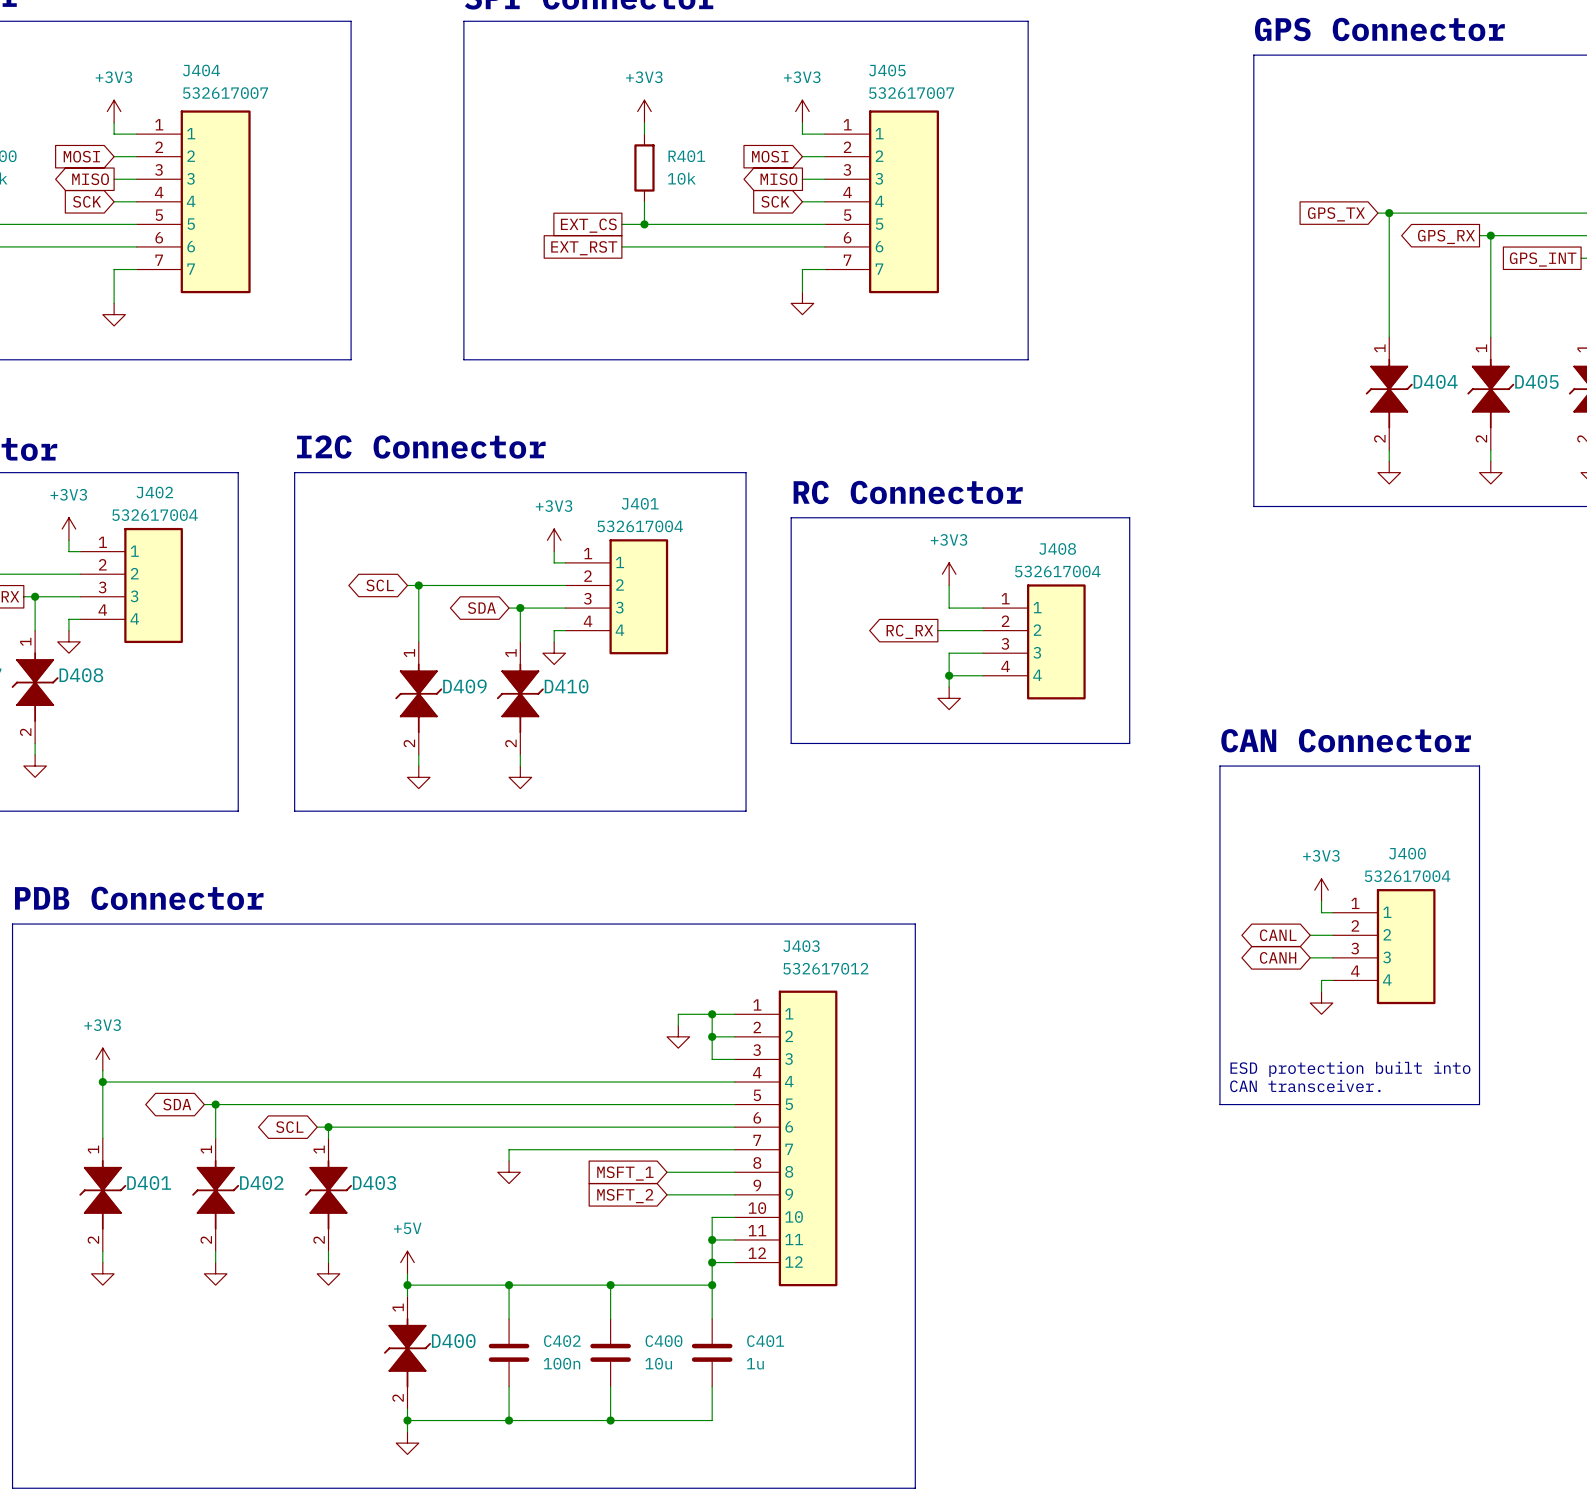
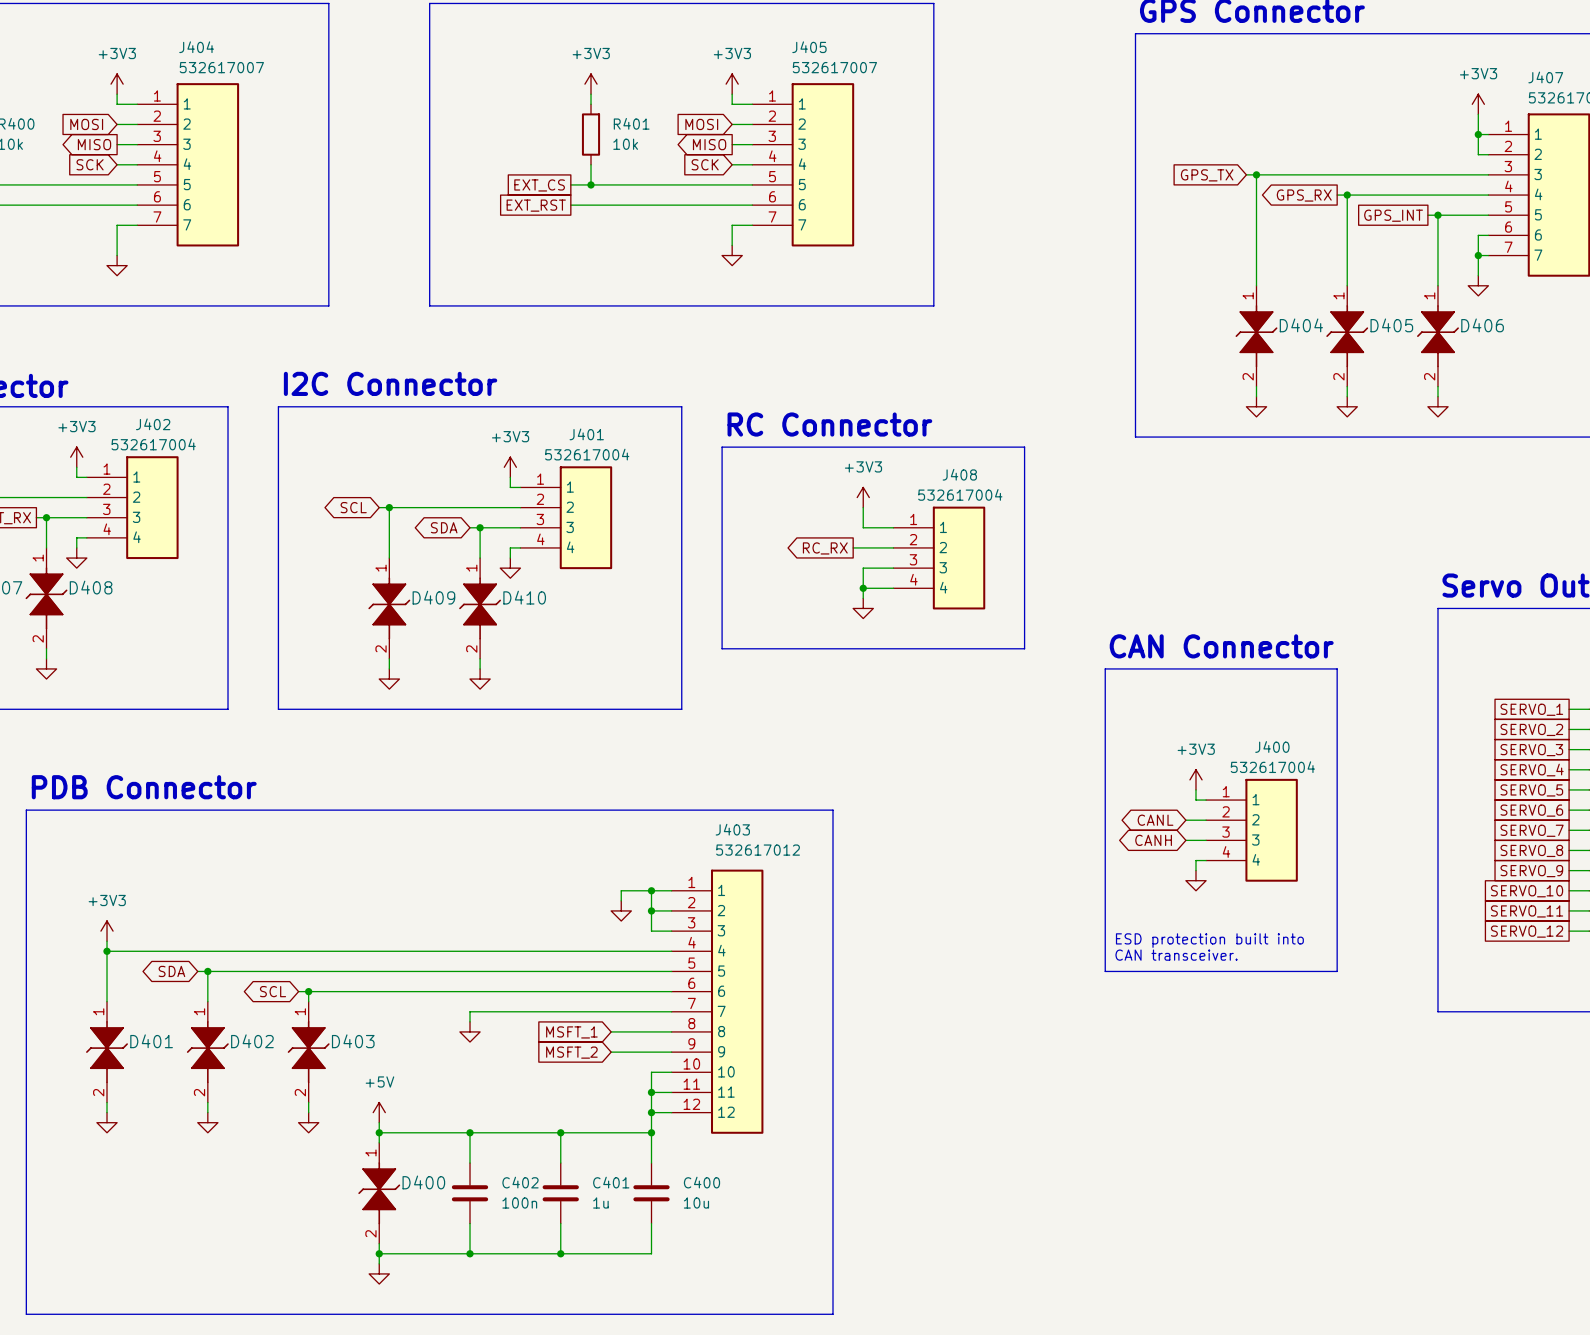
C400 name: C400 (663, 1341) -> C401 (611, 1182)
C401 name: C401 (765, 1341) -> C400 (701, 1182)
C400 value: 10u (658, 1363) -> 1u (600, 1202)
C401 value: 1u (755, 1363) -> 10u (696, 1202)

